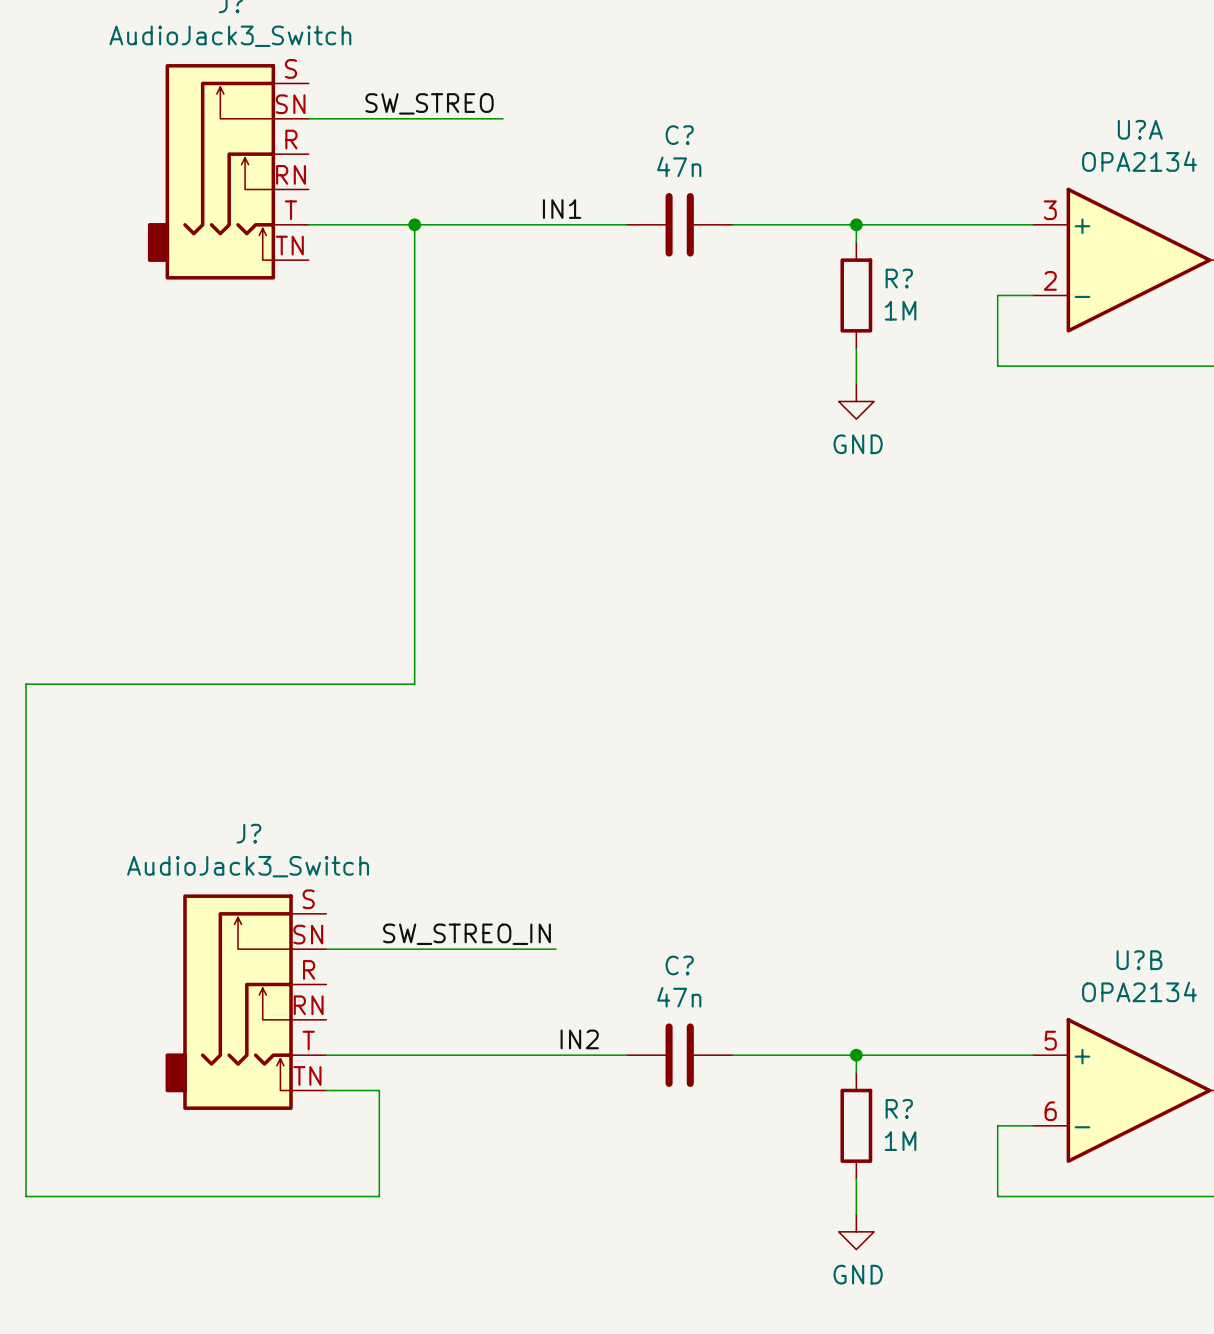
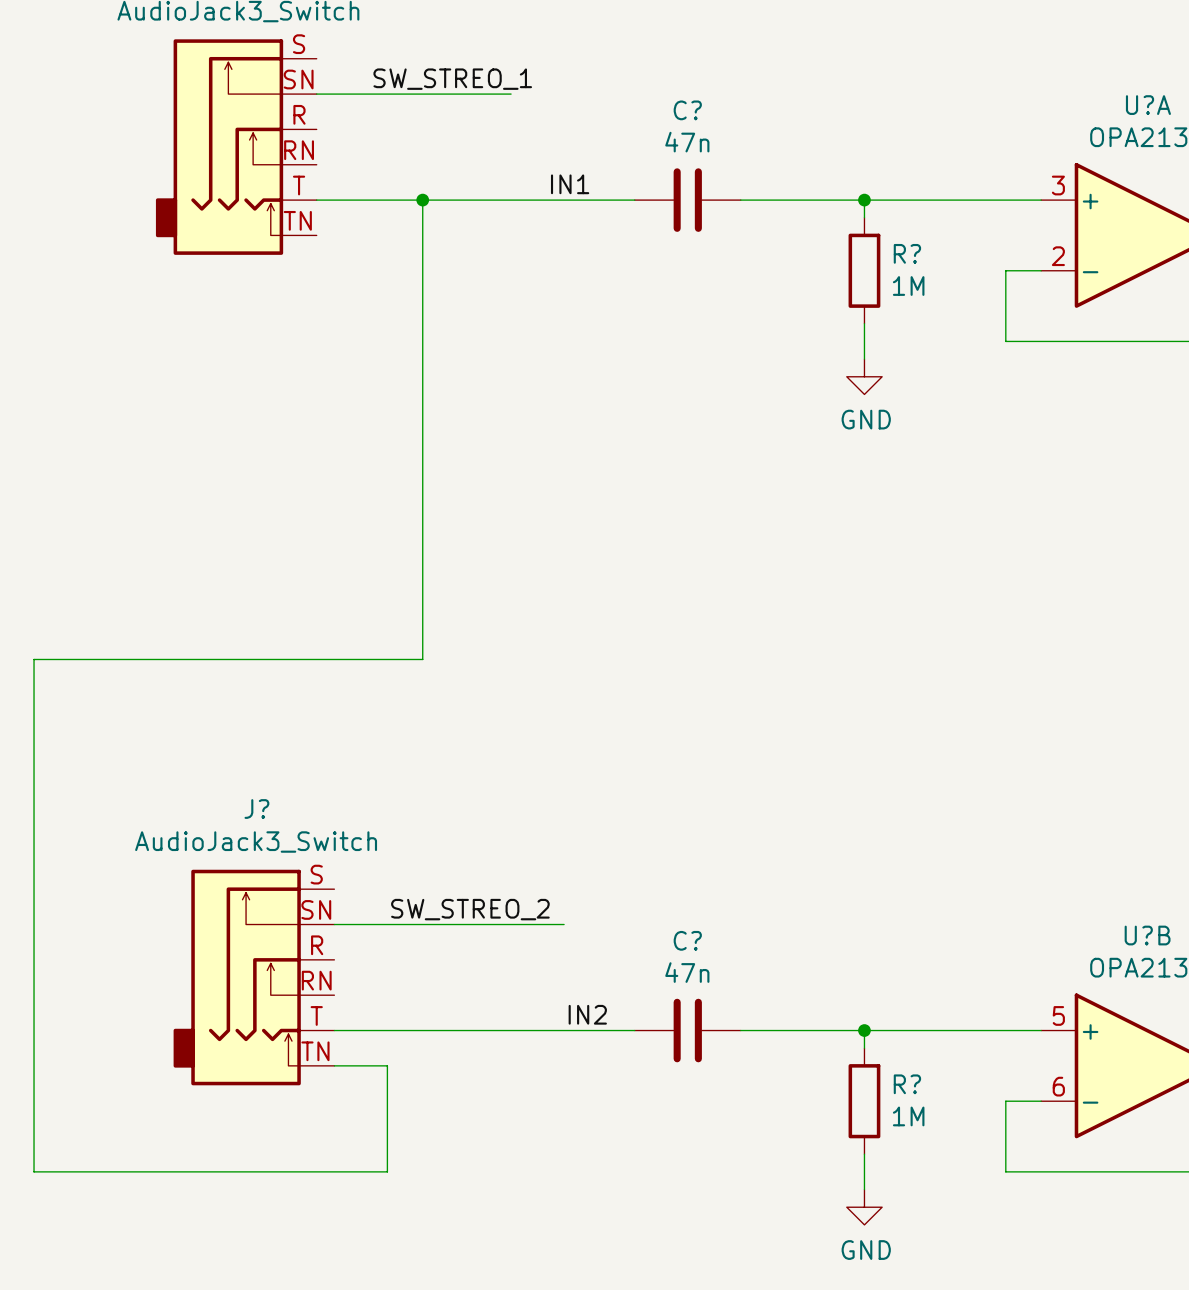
label: SW_STREO (429, 103) -> SW_STREO_1 (452, 79)
label: SW_STREO_IN (466, 934) -> SW_STREO_2 (470, 909)

